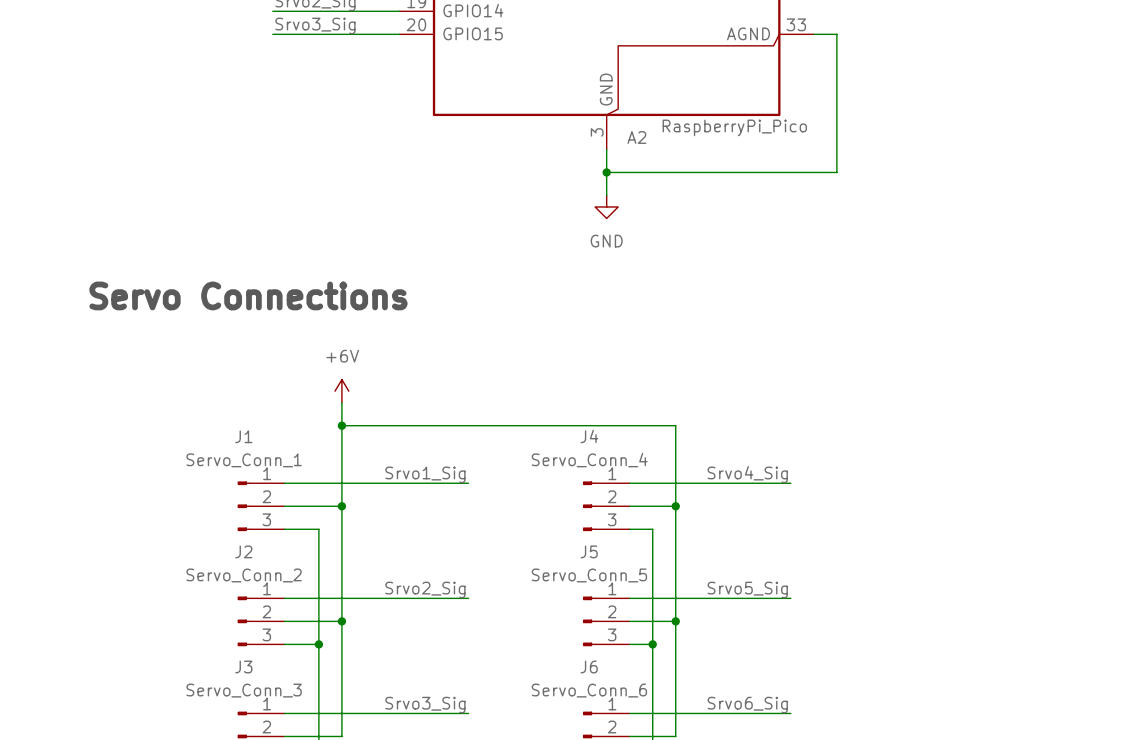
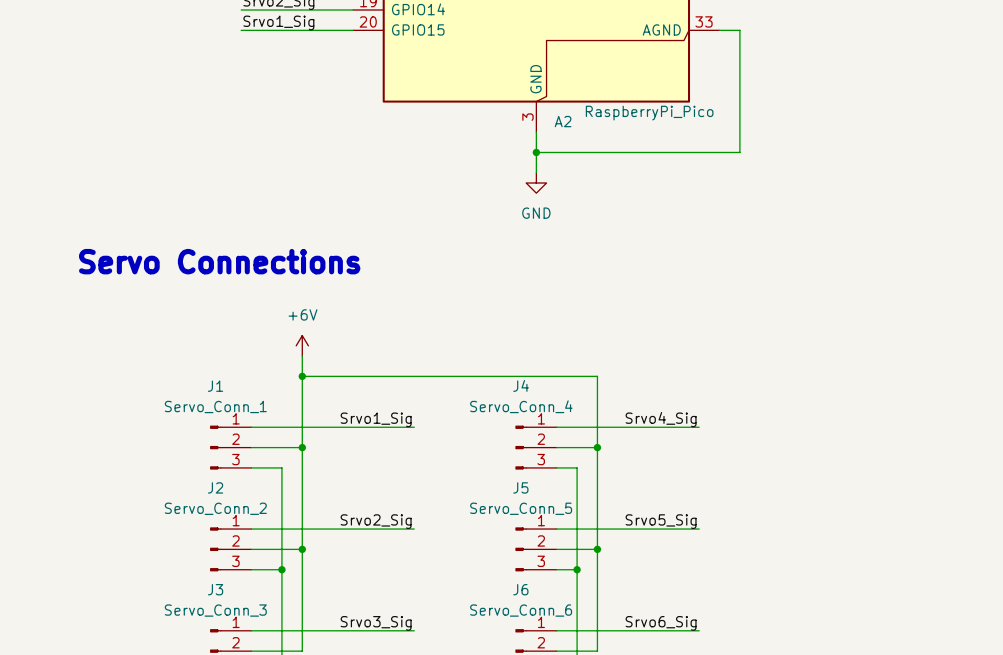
label: Srvo3_Sig (315, 25) -> Srvo1_Sig (278, 22)

